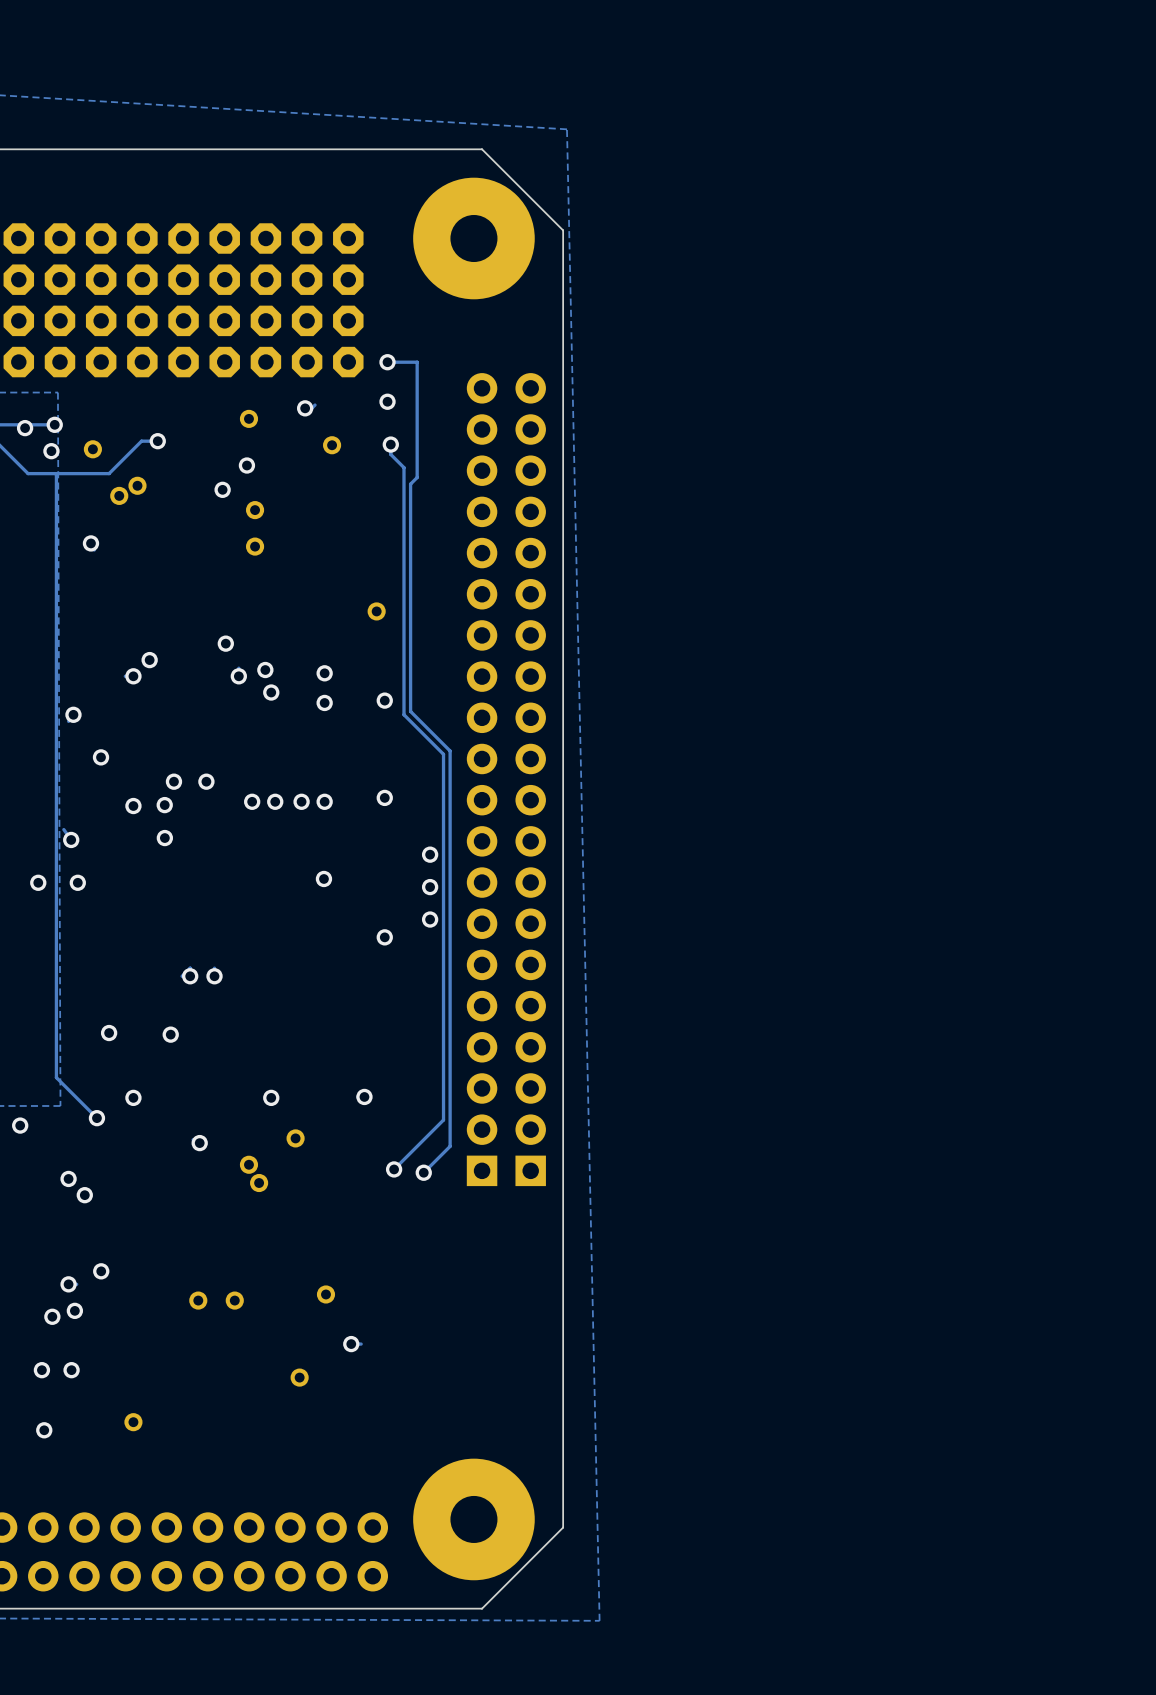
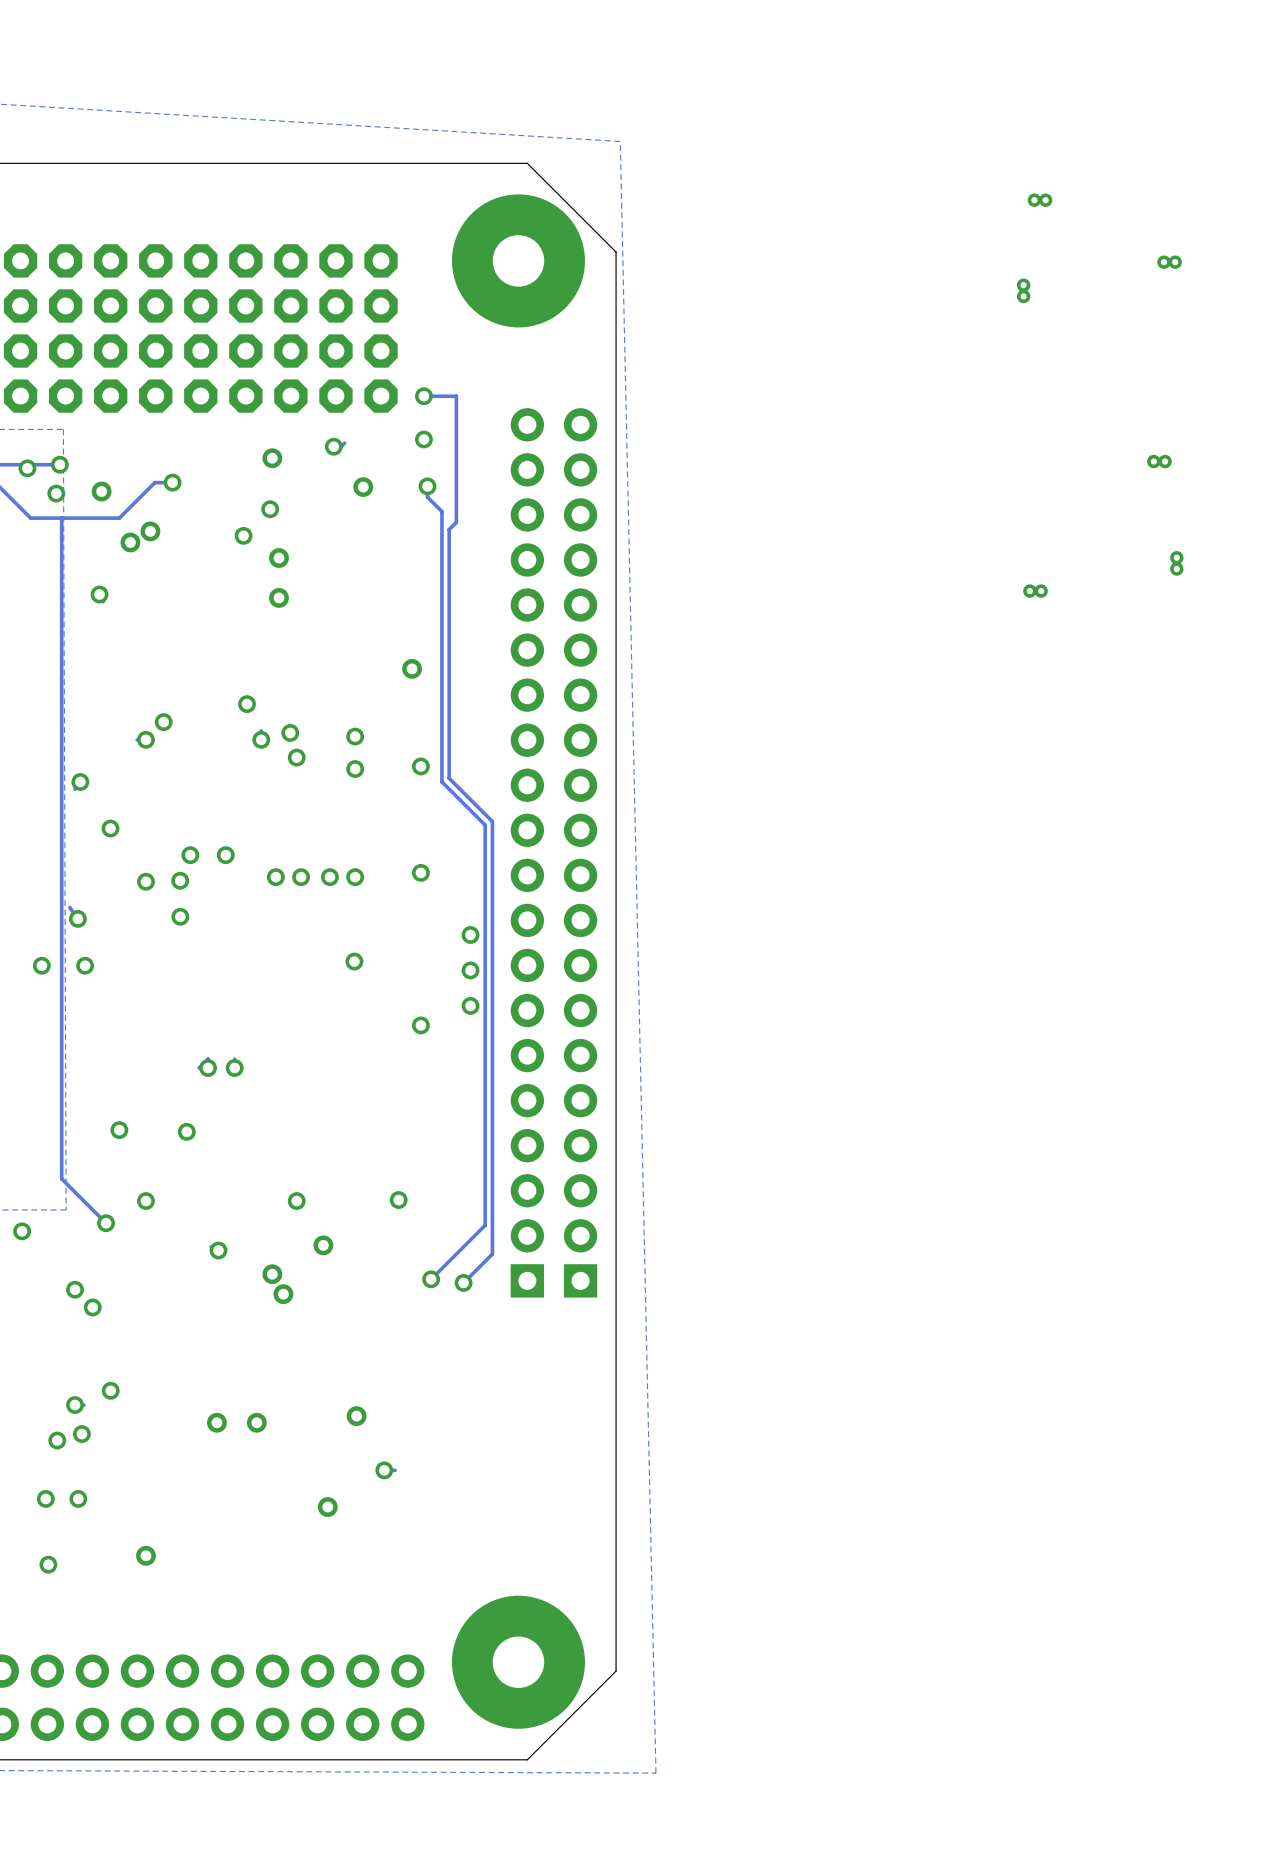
via: none -> (1034, 200)
via: none -> (1045, 200)
via: none -> (1163, 262)
via: none -> (1175, 262)
via: none -> (1023, 285)
via: none -> (1023, 296)
via: none -> (1153, 461)
via: none -> (1165, 461)
via: none -> (1176, 557)
via: none -> (1176, 569)
via: none -> (1029, 591)
via: none -> (1041, 591)

